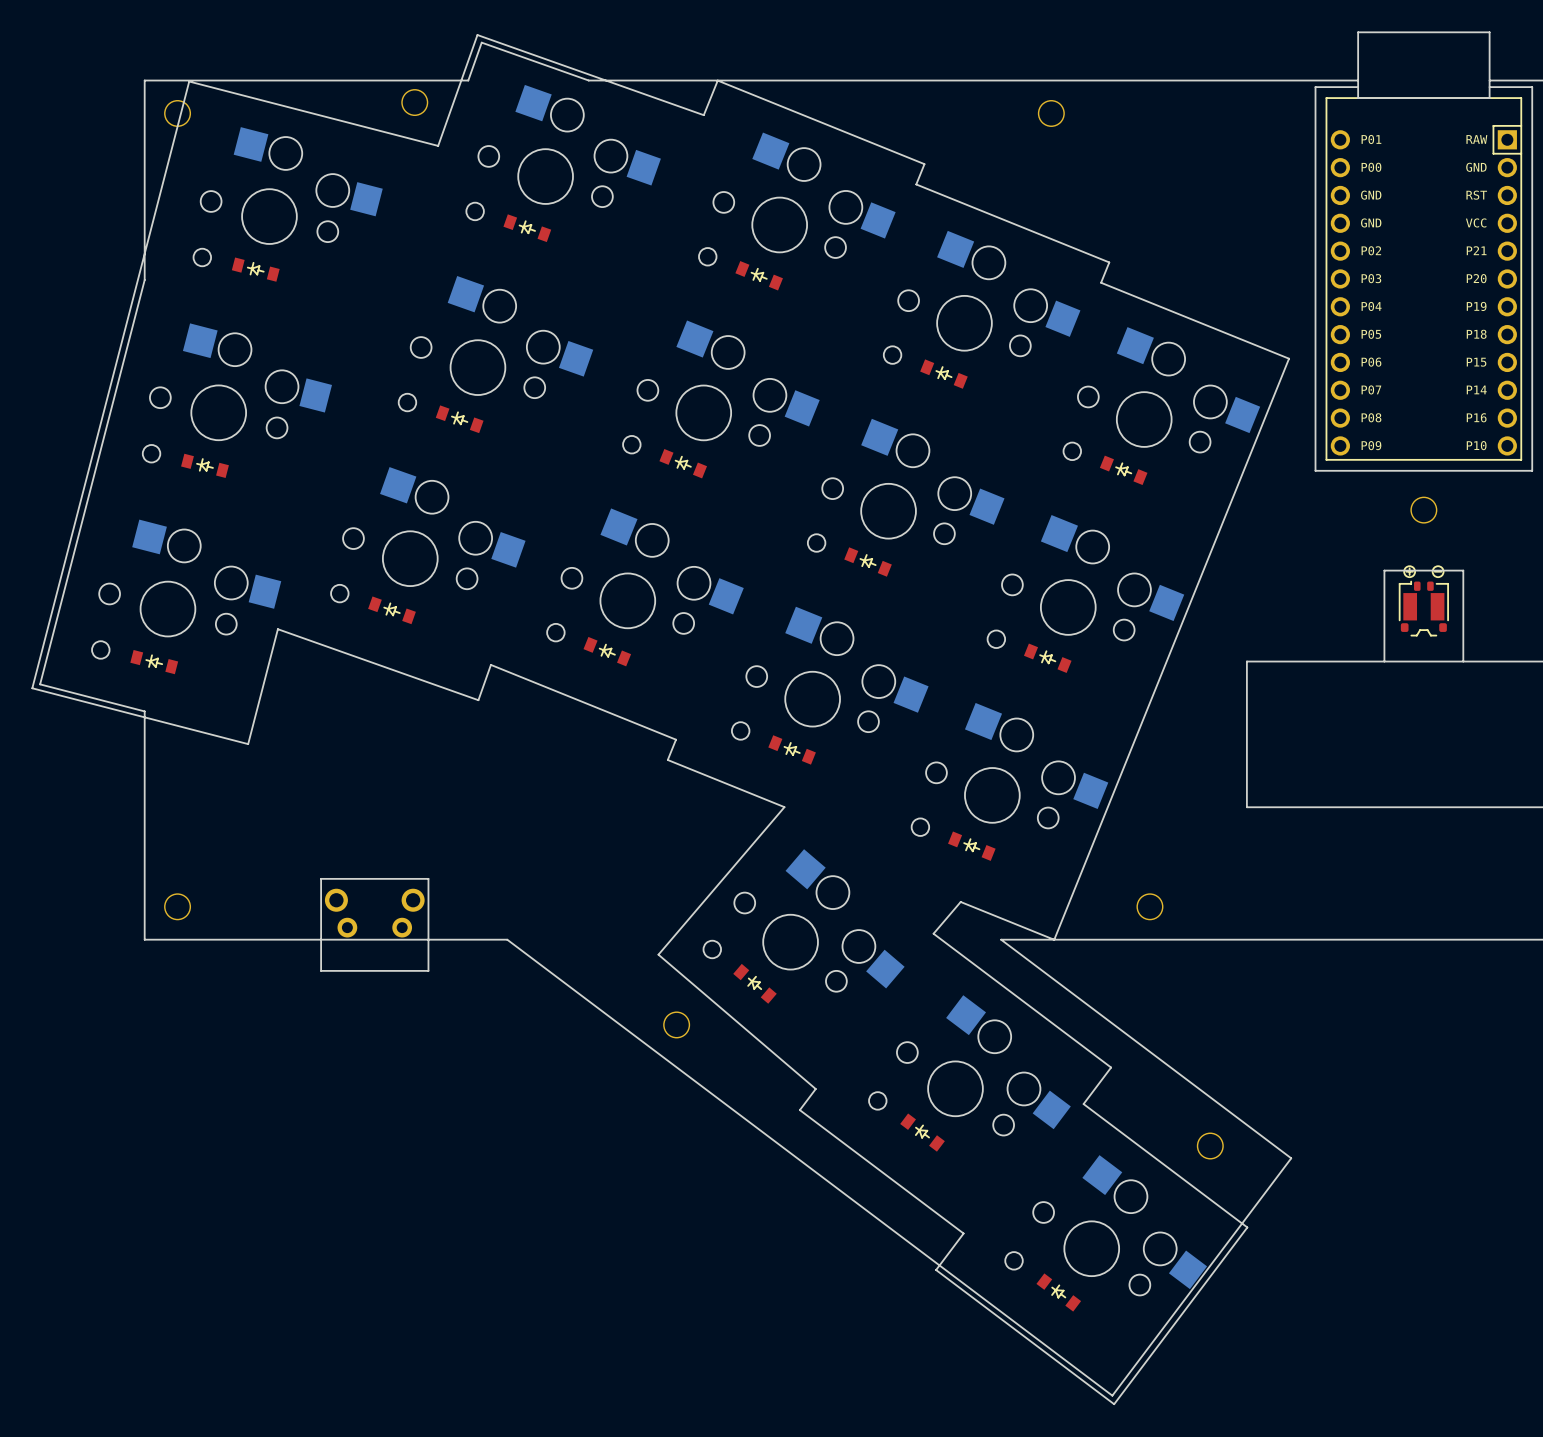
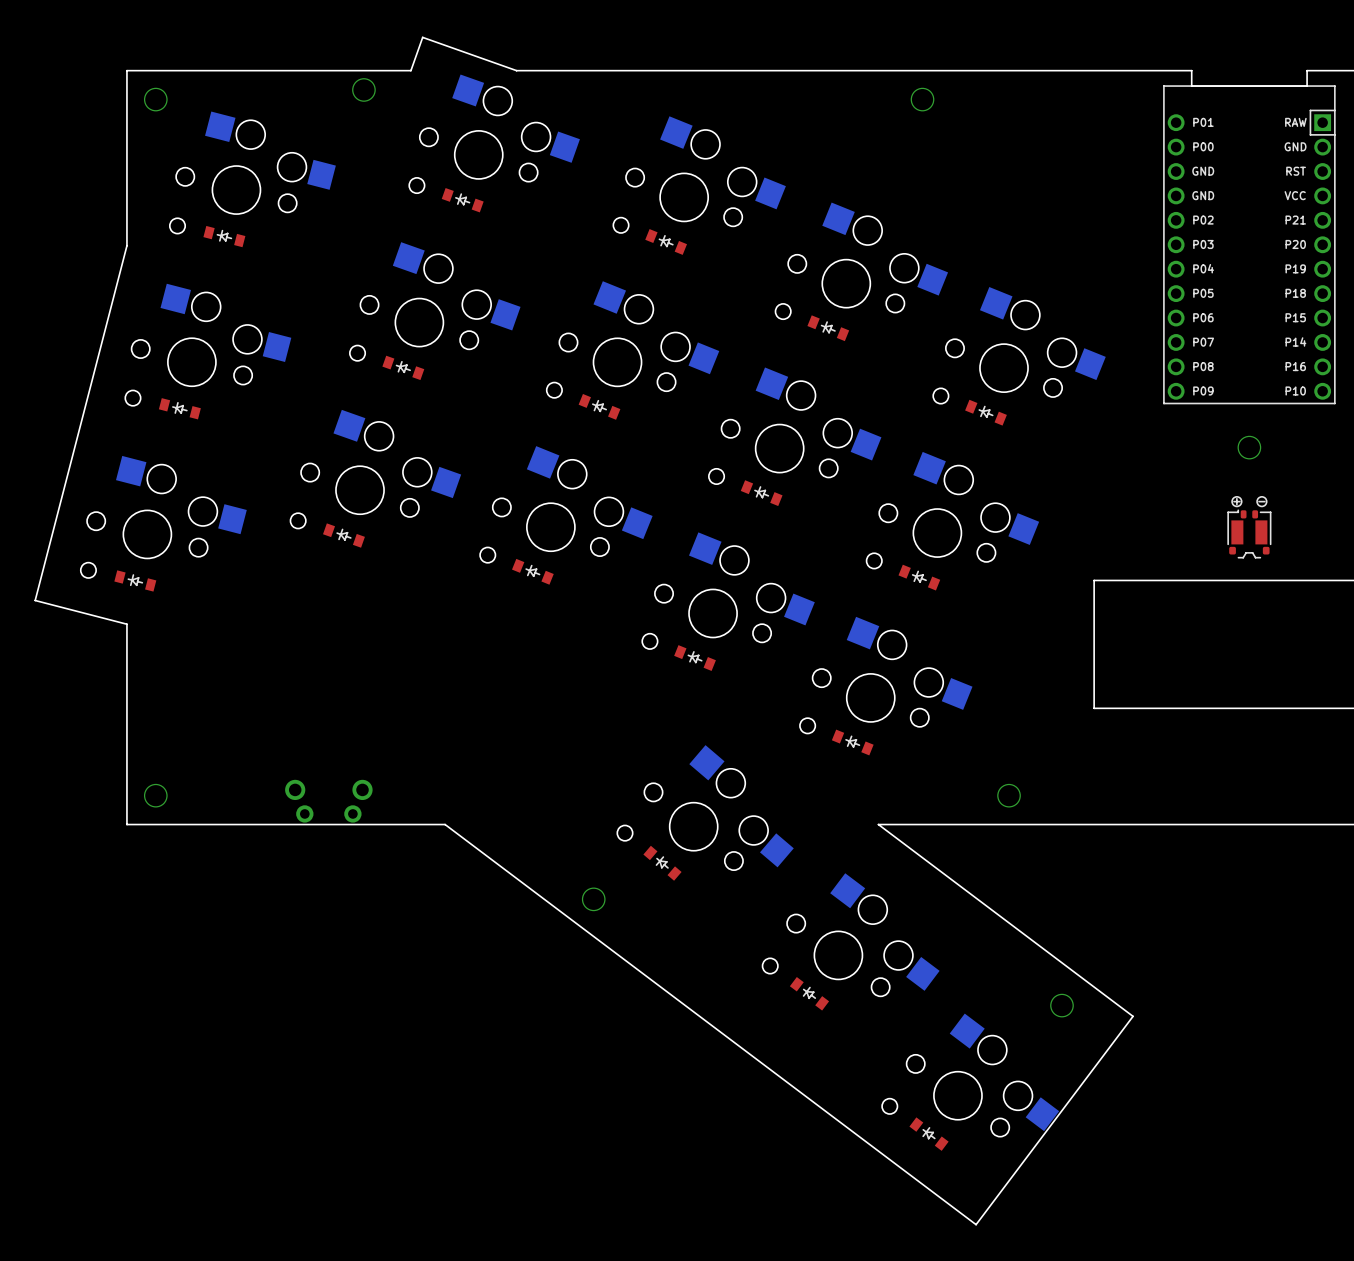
board edge: (477, 35) (703, 115) (717, 80) (924, 164) (916, 184) (1109, 262) (1101, 282) (1289, 358) (1054, 939) (960, 901) (933, 933) (1111, 1067) (1083, 1104) (1247, 1227) (1114, 1404) (936, 1270) (963, 1233) (799, 1110) (815, 1089) (658, 954) (784, 807) (667, 759) (676, 739) (490, 664) (478, 700) (277, 629) (248, 744) (32, 688) (189, 81) (438, 145) (477, 35) -> none
board edge: (1358, 80) (1358, 32) (1489, 32) (1489, 80) -> none
board edge: (1358, 87) (1315, 87) (1315, 470) (1532, 470) (1532, 87) (1489, 87) -> none
board edge: (1384, 661) (1384, 570) (1463, 570) (1463, 661) -> none
board edge: (321, 878) (428, 878) (428, 970) (321, 970) (321, 878) -> none

